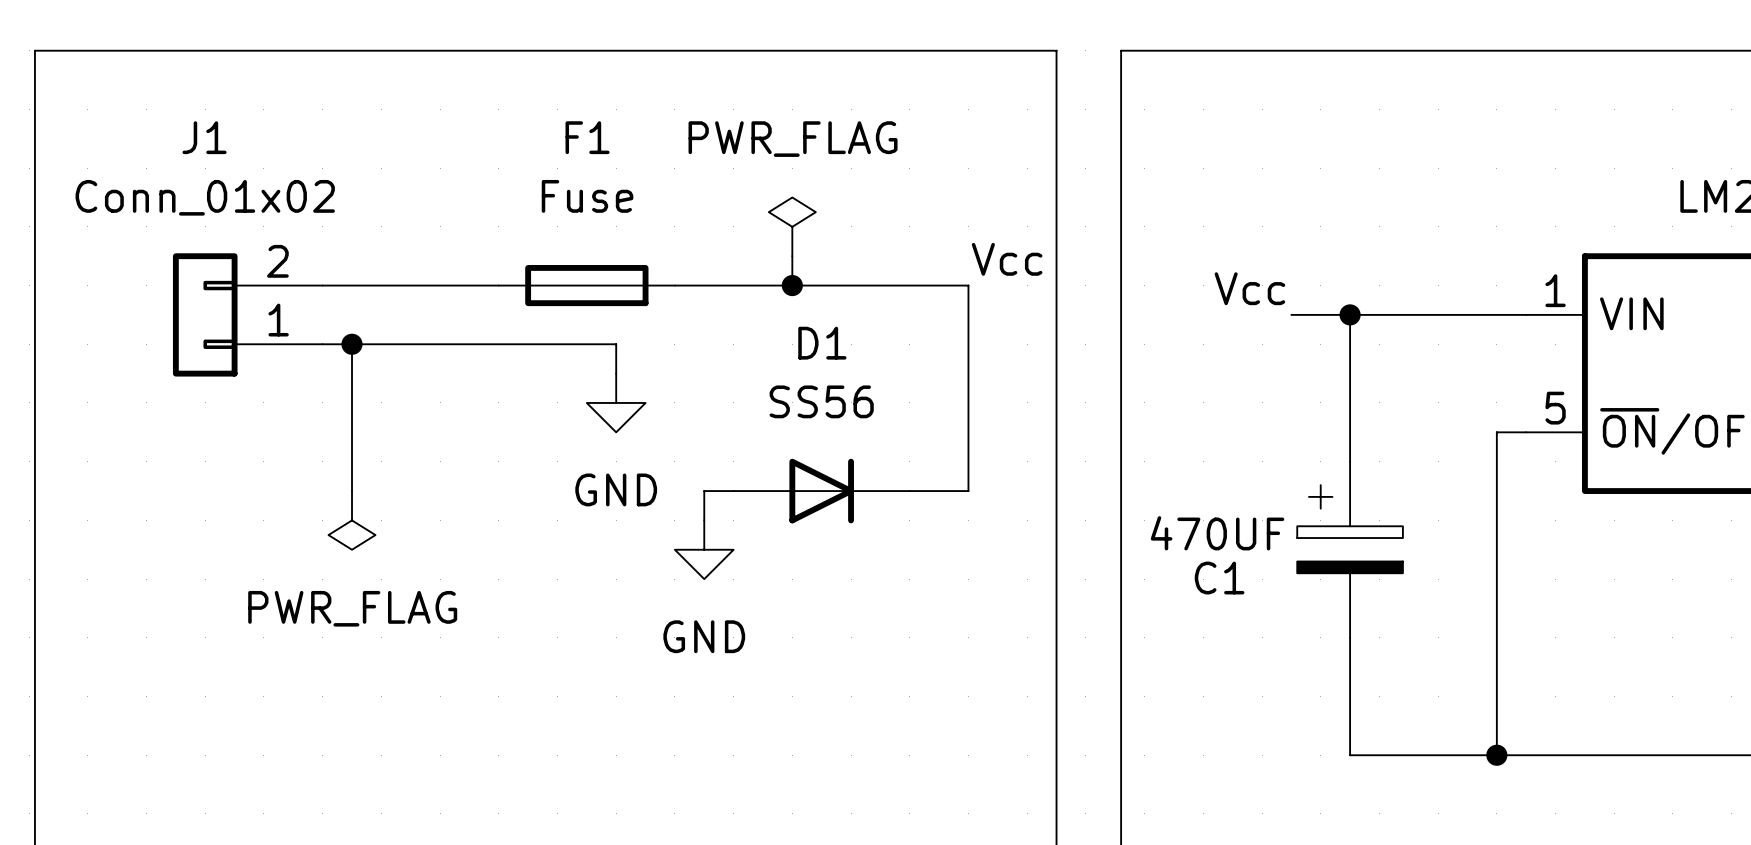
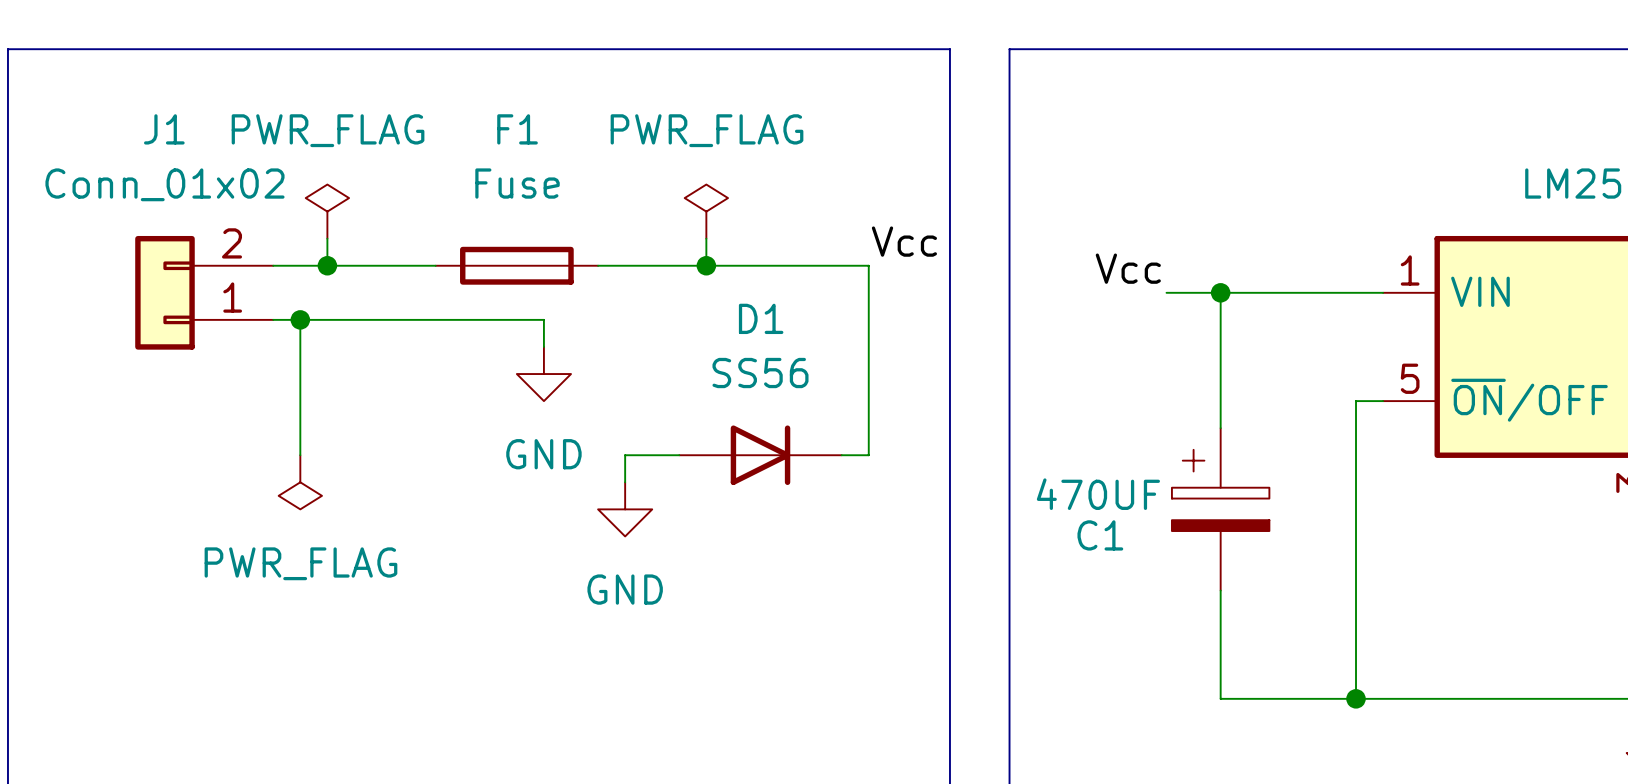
power symbol: none -> PWR_FLAG (327, 211)
wire: none -> (327, 238) (327, 265)
junction: none -> (327, 265)
D1 position: (821, 491) -> (760, 455)

